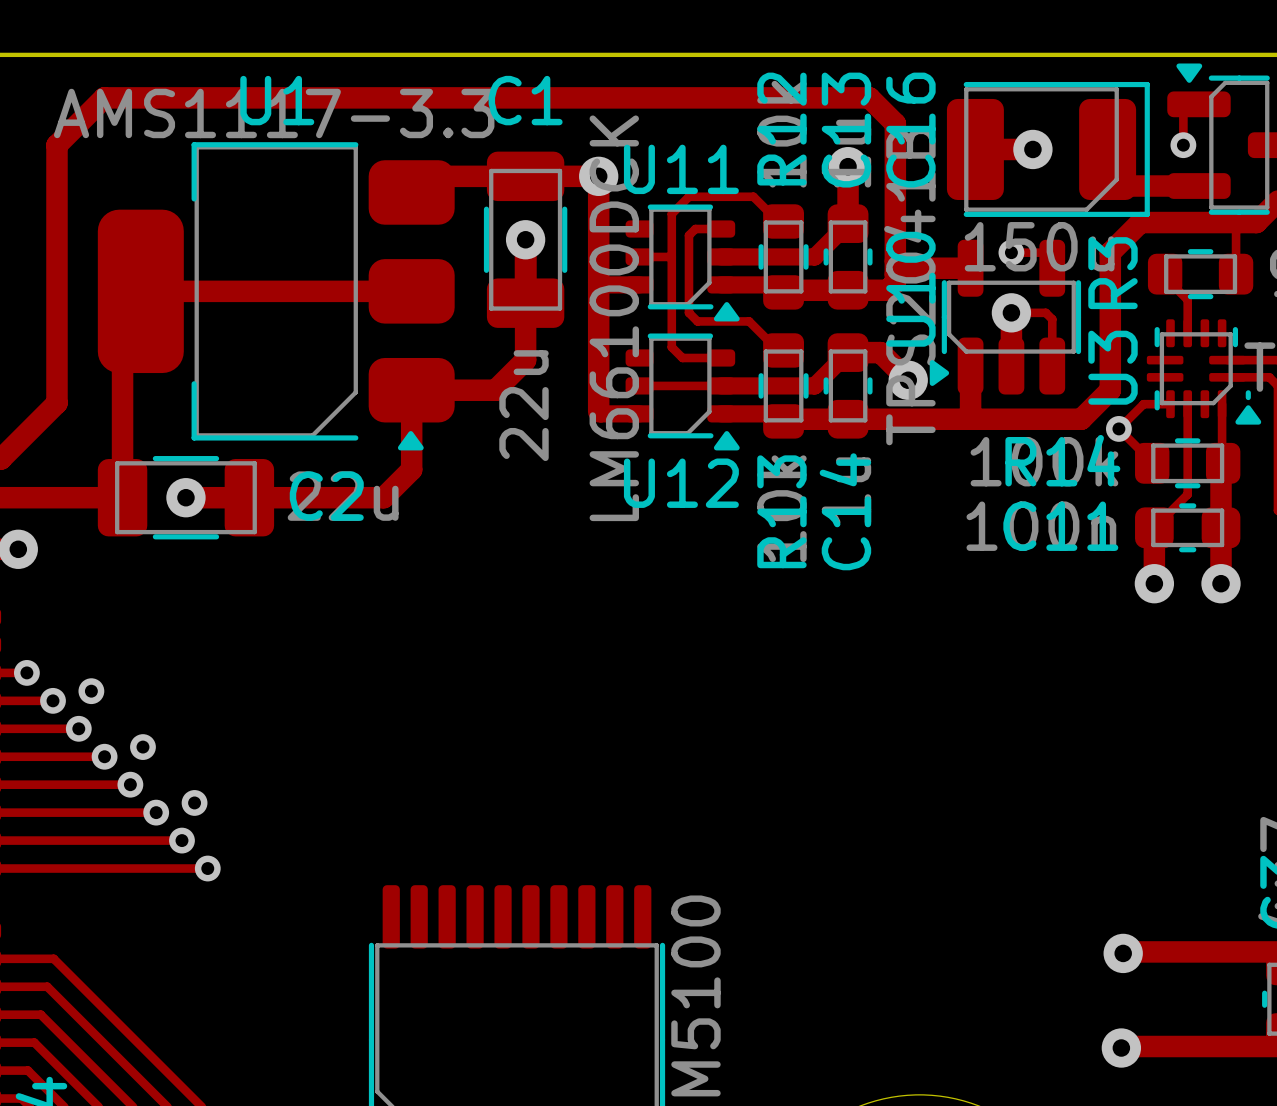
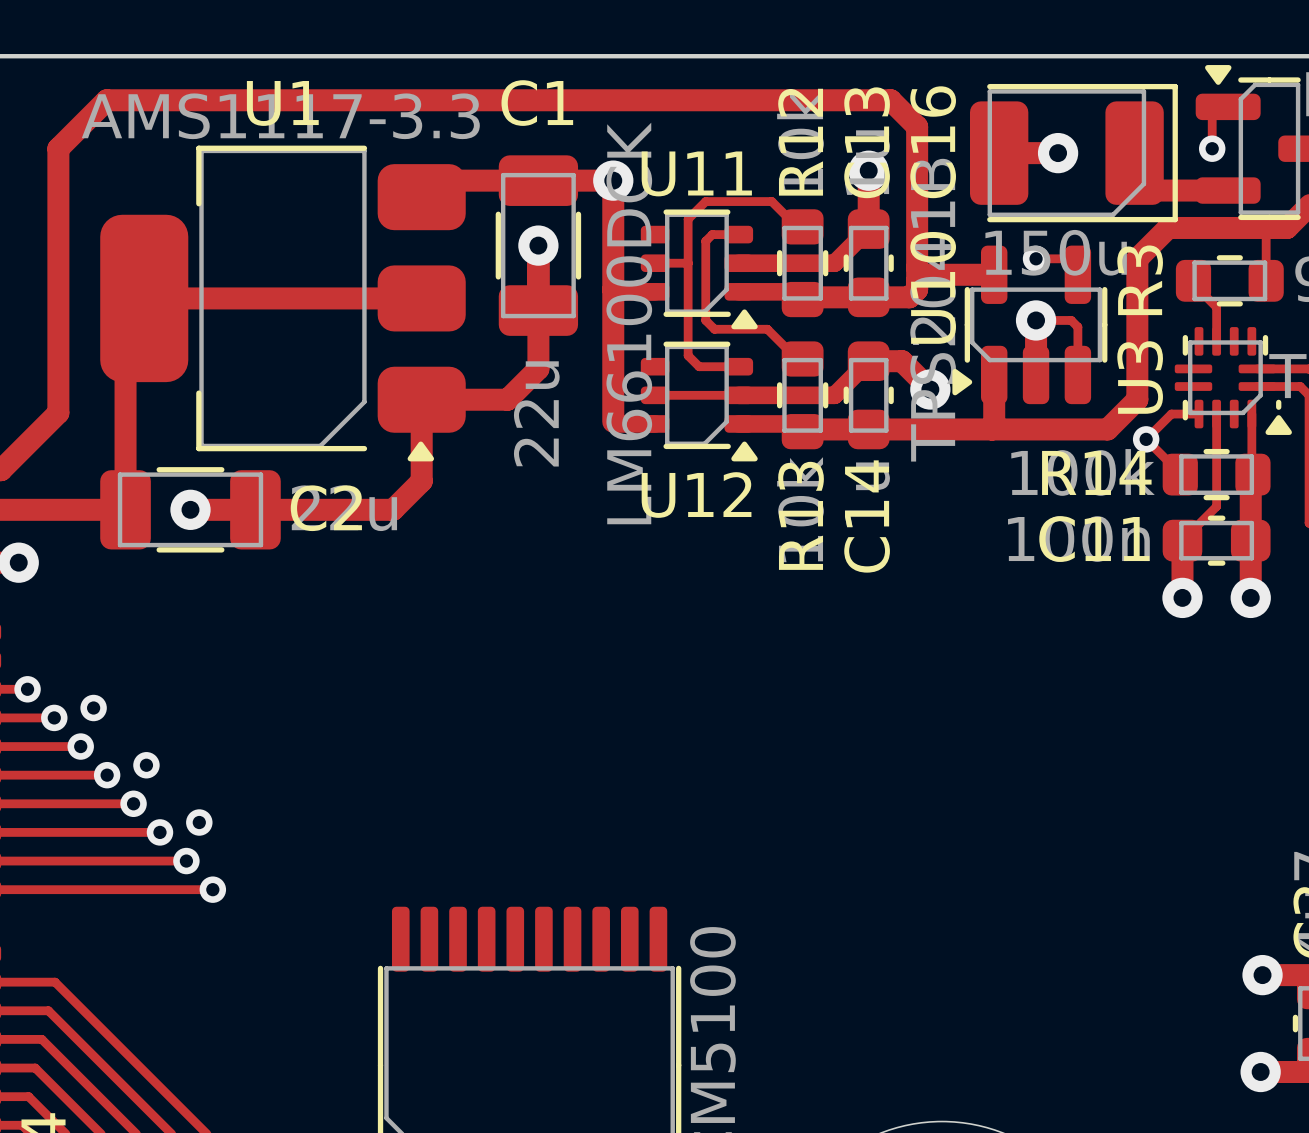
track: (1232, 951) (1123, 953) -> none
via: none -> (1262, 975)
via: (1123, 953) -> none
track: (1230, 1046) (1121, 1048) -> none
via: none -> (1260, 1071)
via: (1121, 1048) -> none

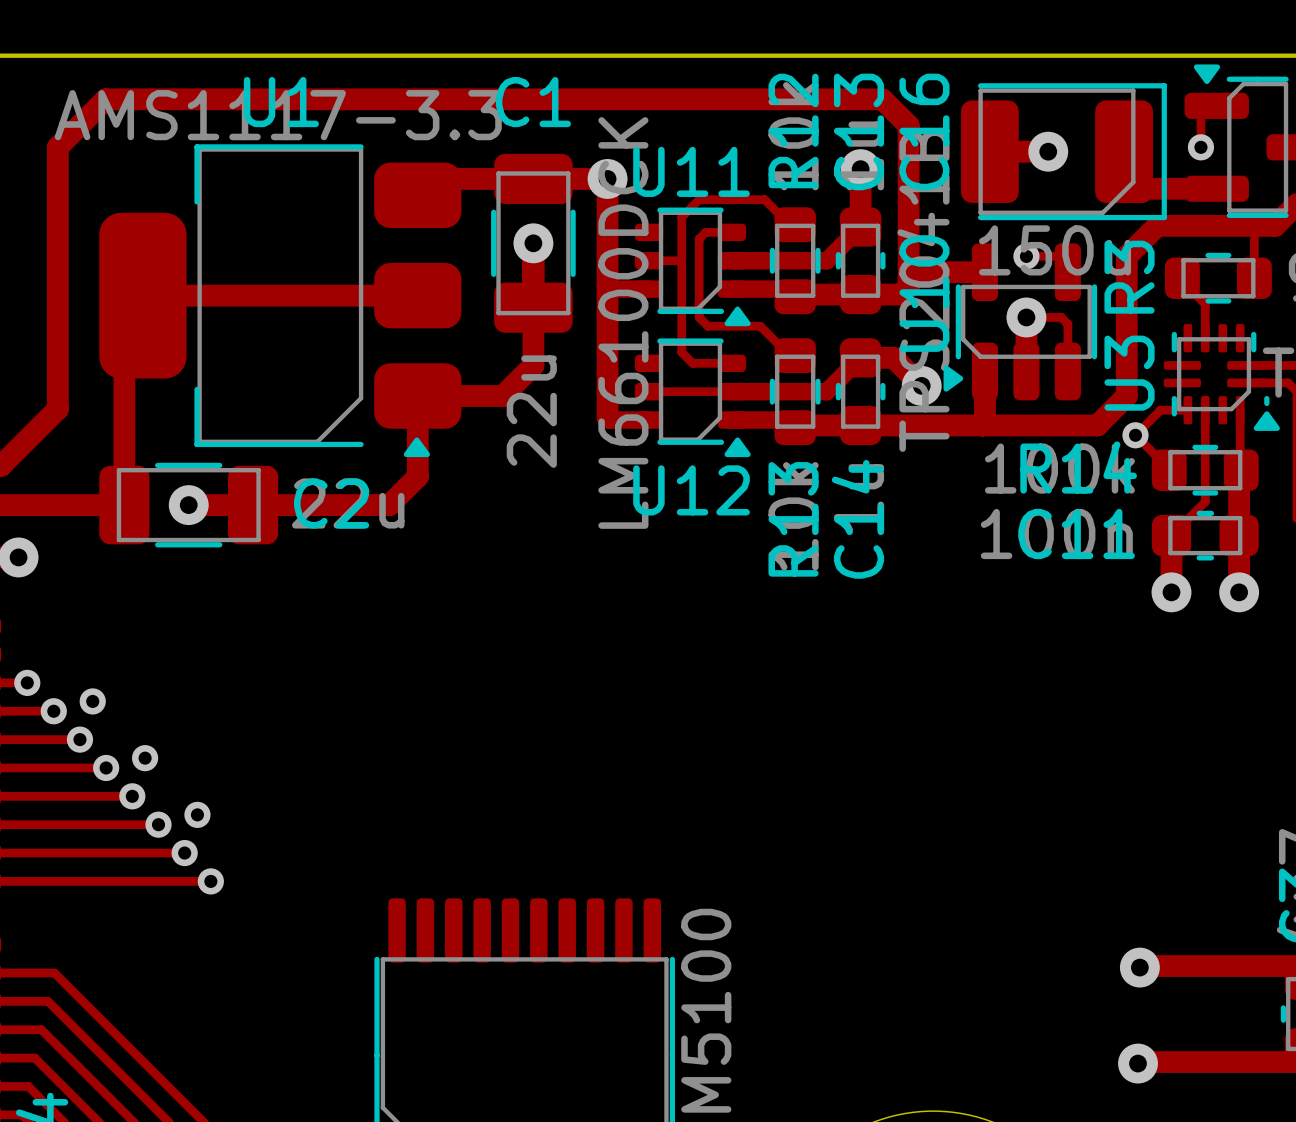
track: none -> (1250, 966) (1141, 966) (1139, 967)
via: (1262, 975) -> none
via: none -> (1139, 967)
track: none -> (1248, 1062) (1139, 1062) (1138, 1063)
via: (1260, 1071) -> none
via: none -> (1138, 1063)

